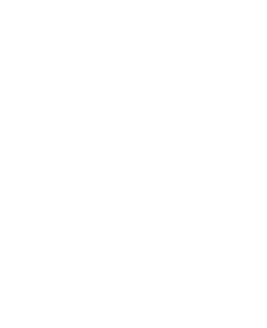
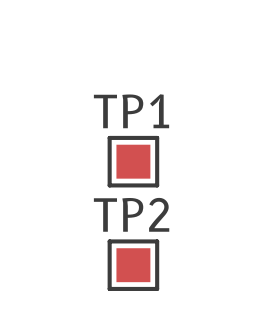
TP1: none -> (133, 161)
TP2: none -> (133, 265)

